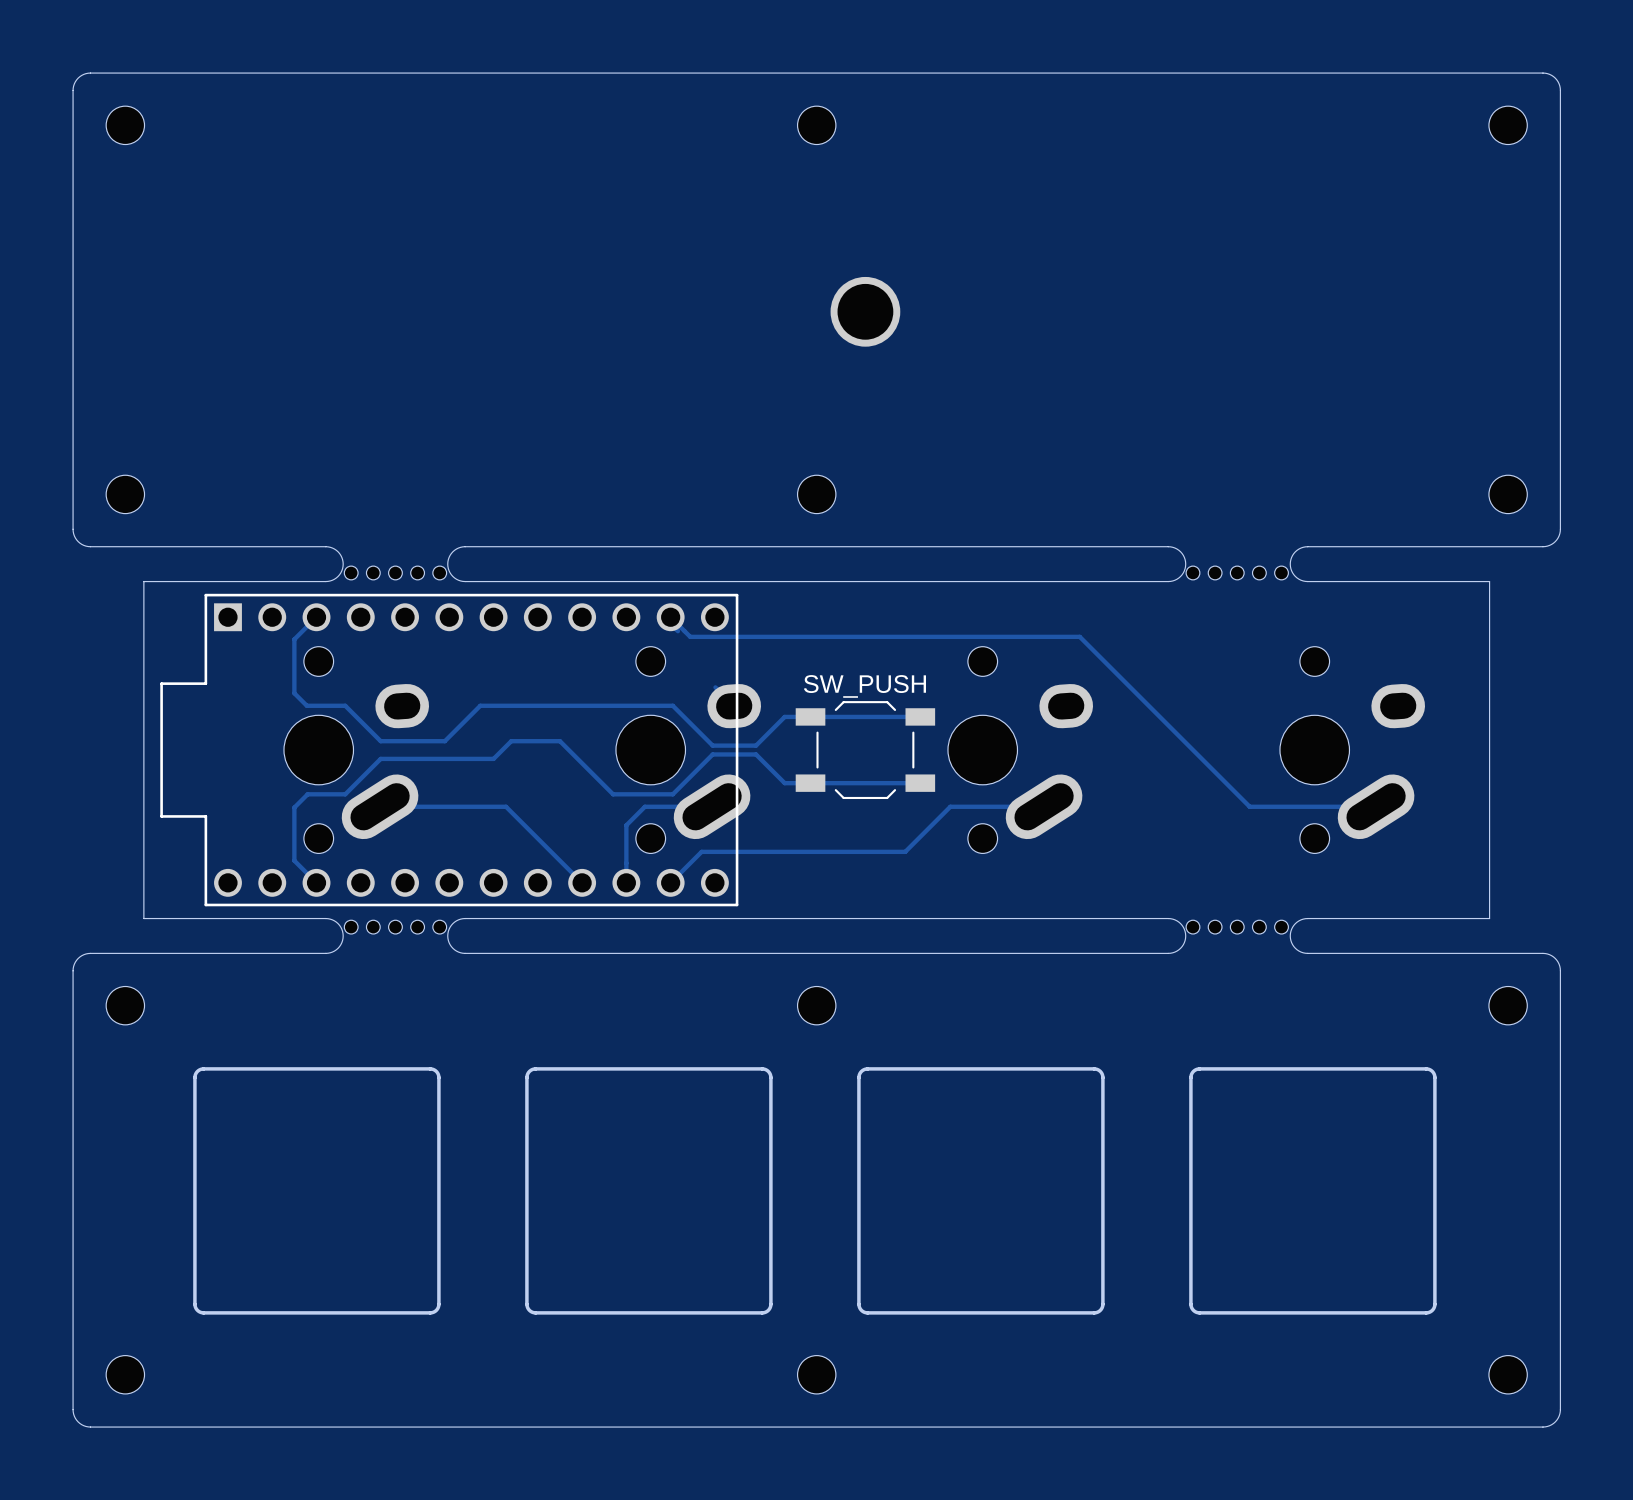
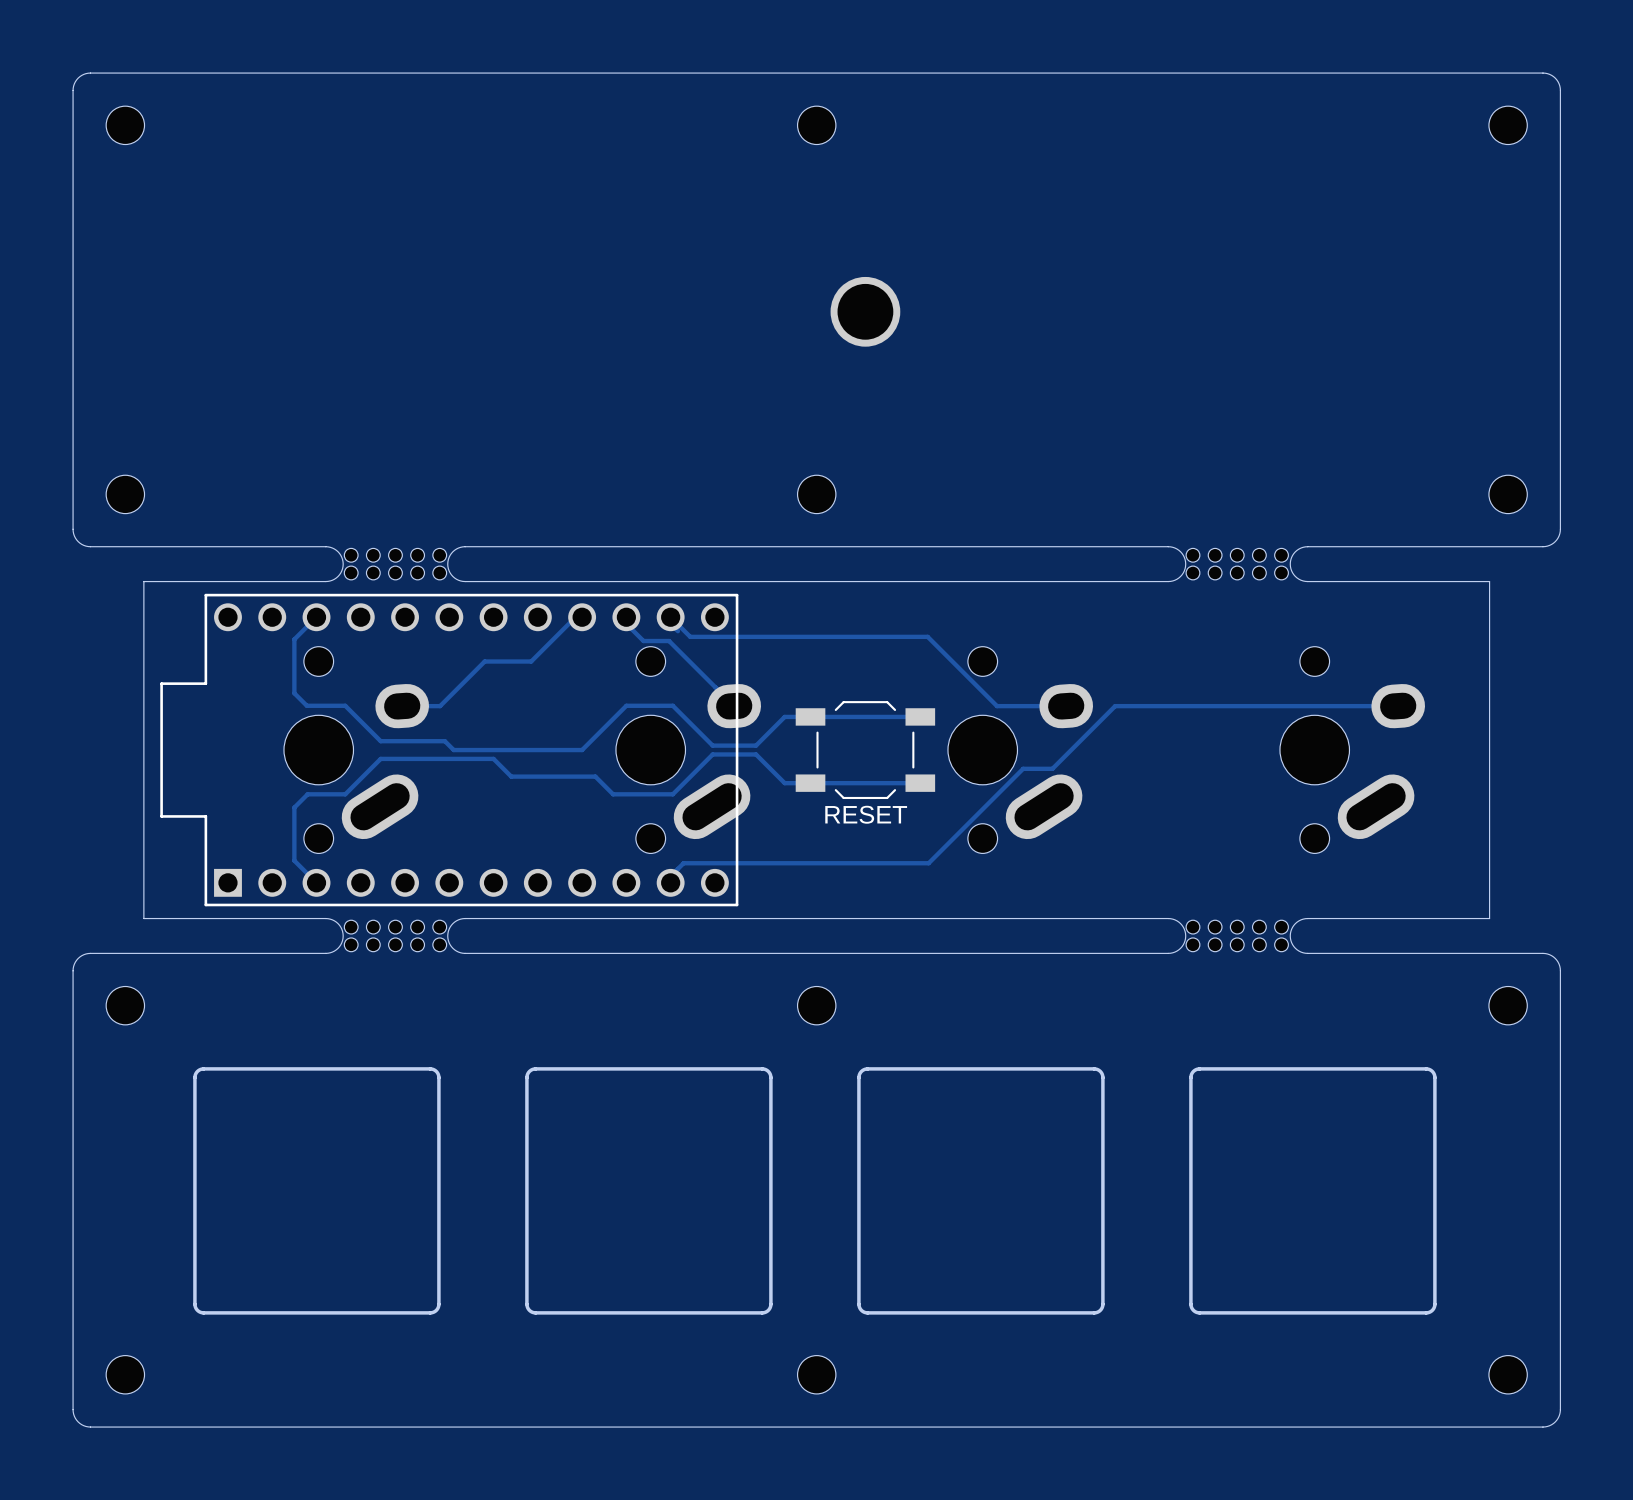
part: none -> (395, 555)
part: none -> (1237, 555)
track: none -> (575, 617) (531, 661) (484, 661) (440, 706) (402, 706)
track: none -> (619, 617) (643, 641) (669, 641) (715, 687)
track: (927, 636) (1079, 636) (1249, 806) (1376, 806) -> (927, 636) (997, 706) (1066, 706)
part value: SW_PUSH (864, 686) -> RESET (866, 814)
track: (626, 705) (480, 705) (444, 741) -> (626, 705) (582, 750) (453, 750) (444, 741)
track: none -> (1398, 706) (1115, 706) (1052, 768) (1023, 768) (928, 863) (683, 863) (664, 882)
part side: bottom (449, 750) -> top (449, 750)
track: (493, 758) (511, 741) (559, 741) (595, 776) -> (493, 758) (511, 776) (595, 776)
track: (380, 806) (506, 806) (582, 882) -> none
track: (712, 806) (644, 806) (626, 825) (626, 882) -> none
track: (1044, 806) (950, 806) (905, 851) (701, 851) (670, 882) -> none
part: none -> (395, 944)
part: none -> (1237, 944)

